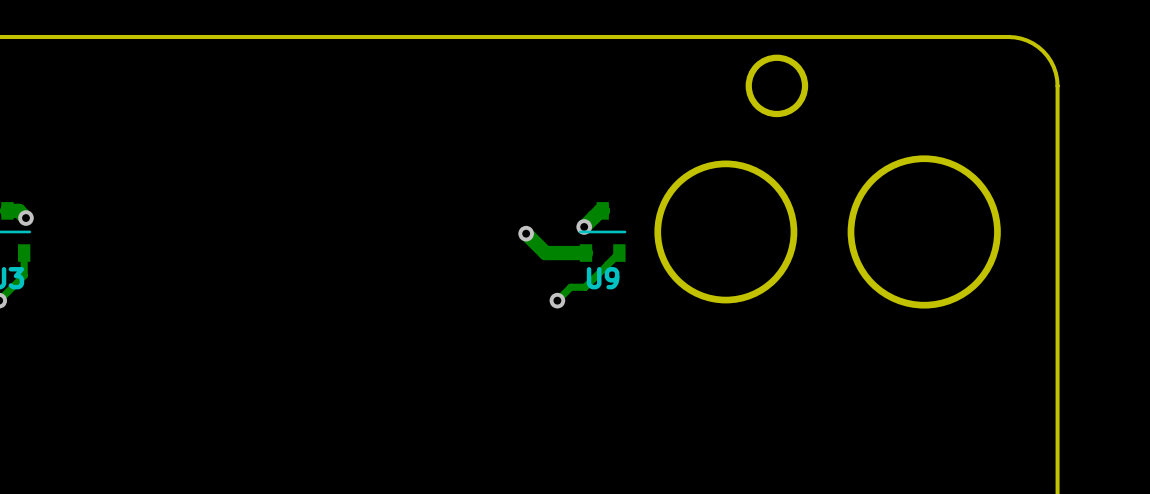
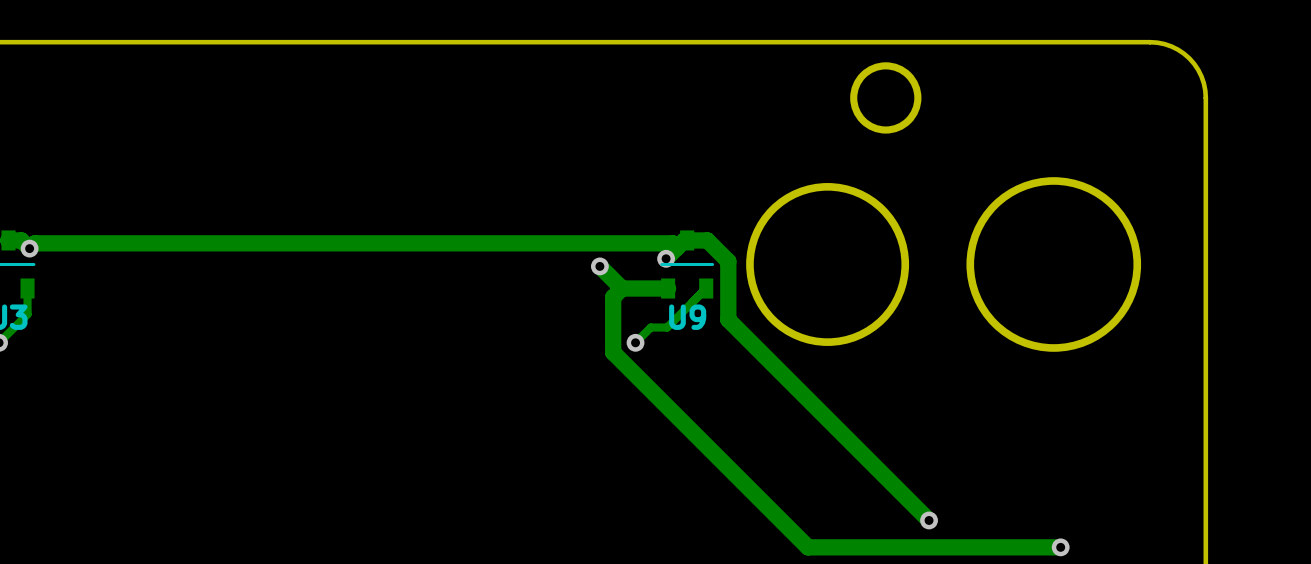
track: none -> (687, 240) (707, 240) (728, 261) (728, 319) (929, 520)
track: none -> (677, 247) (672, 243) (34, 243) (29, 248)
track: none -> (621, 288) (613, 297) (613, 352) (808, 547) (1060, 547)
via: none -> (929, 520)
via: none -> (1060, 547)

